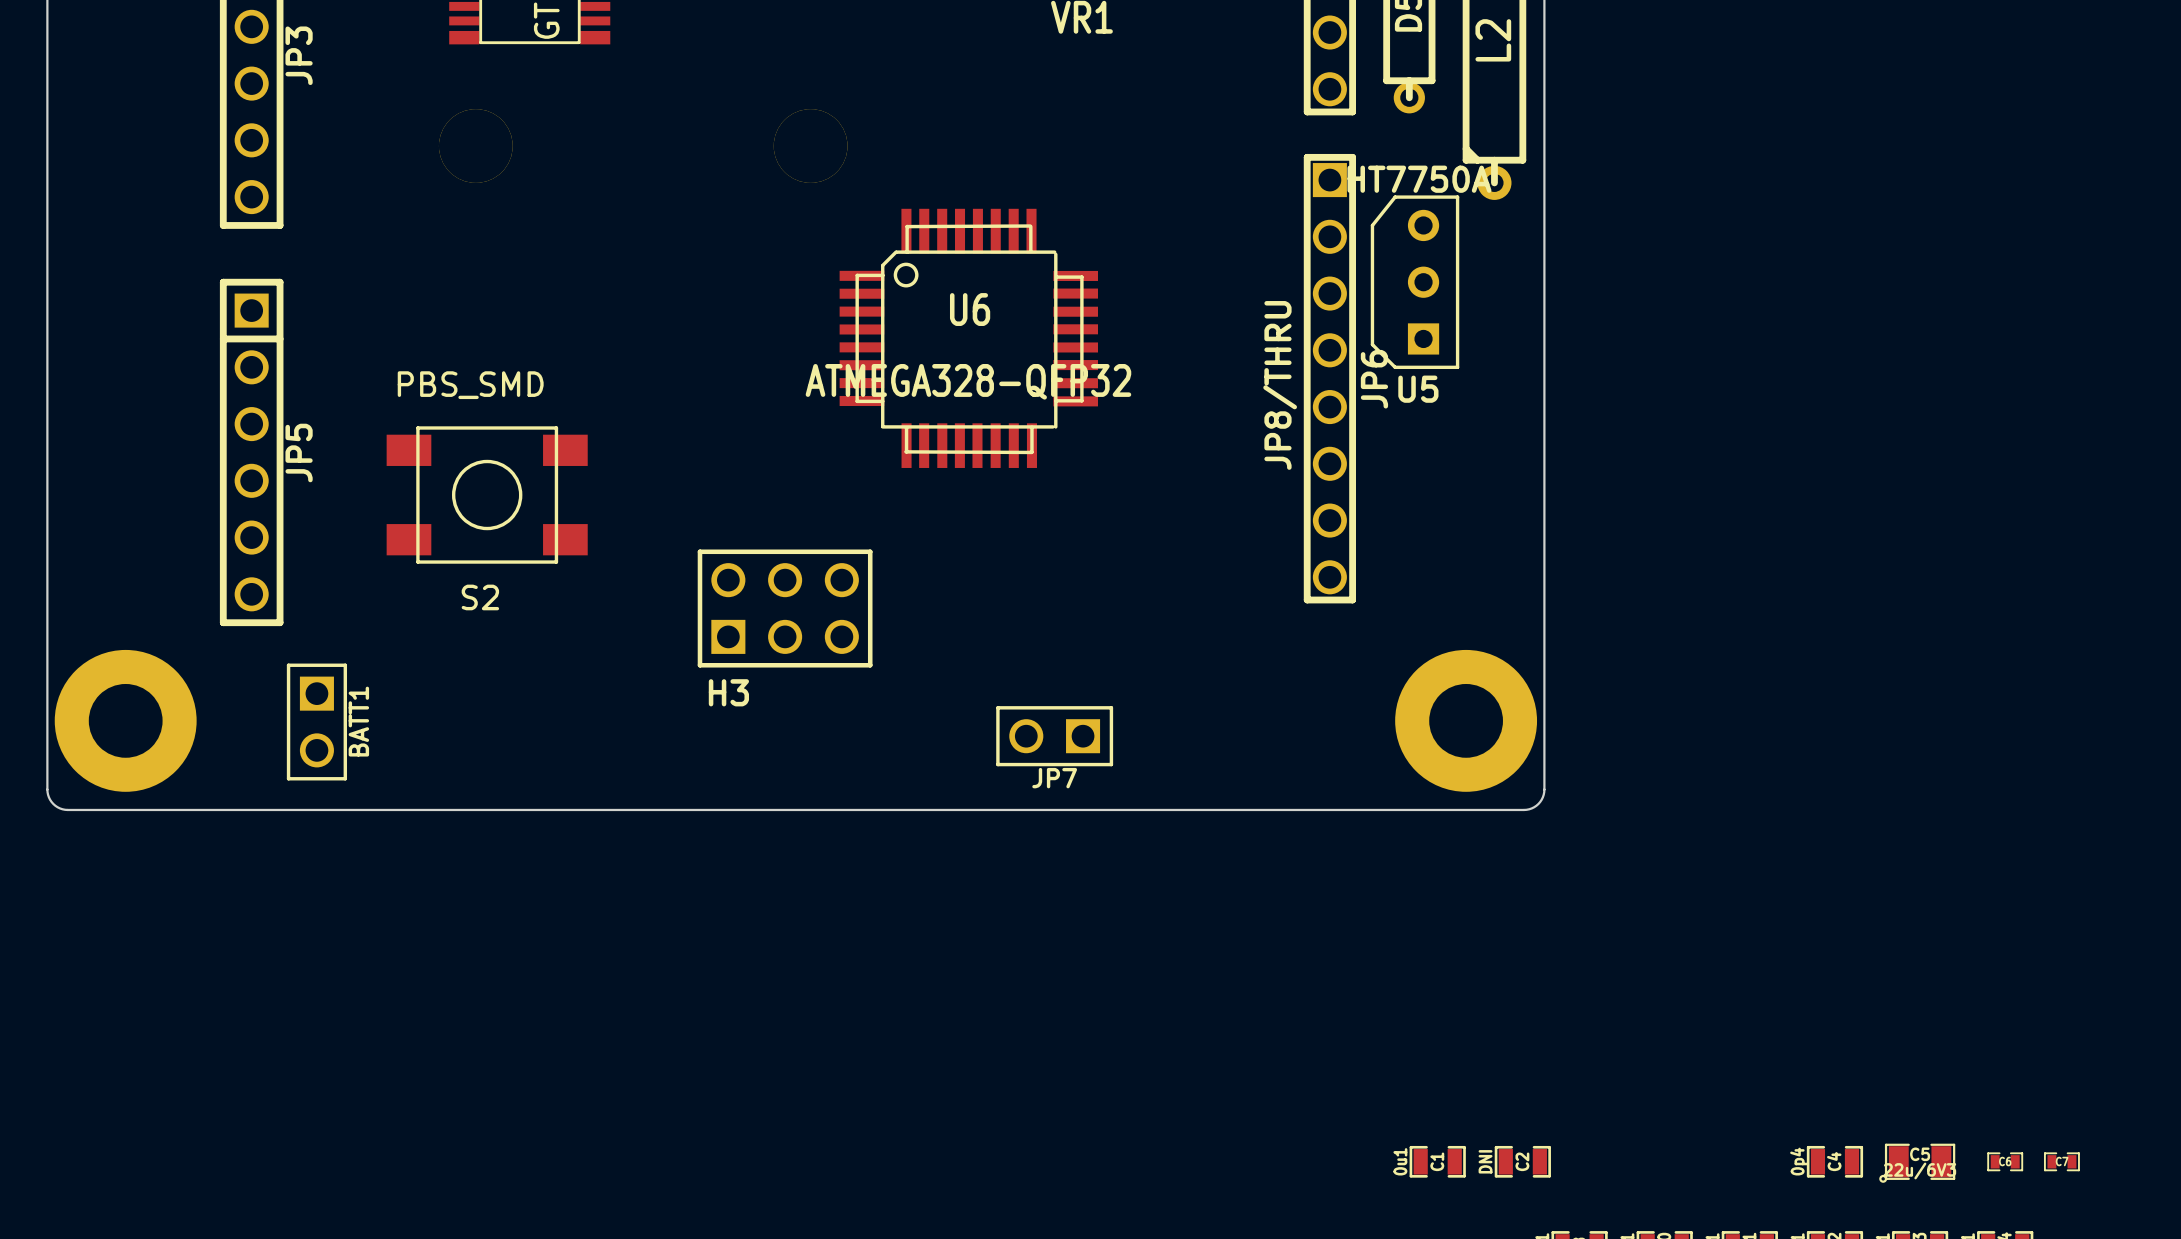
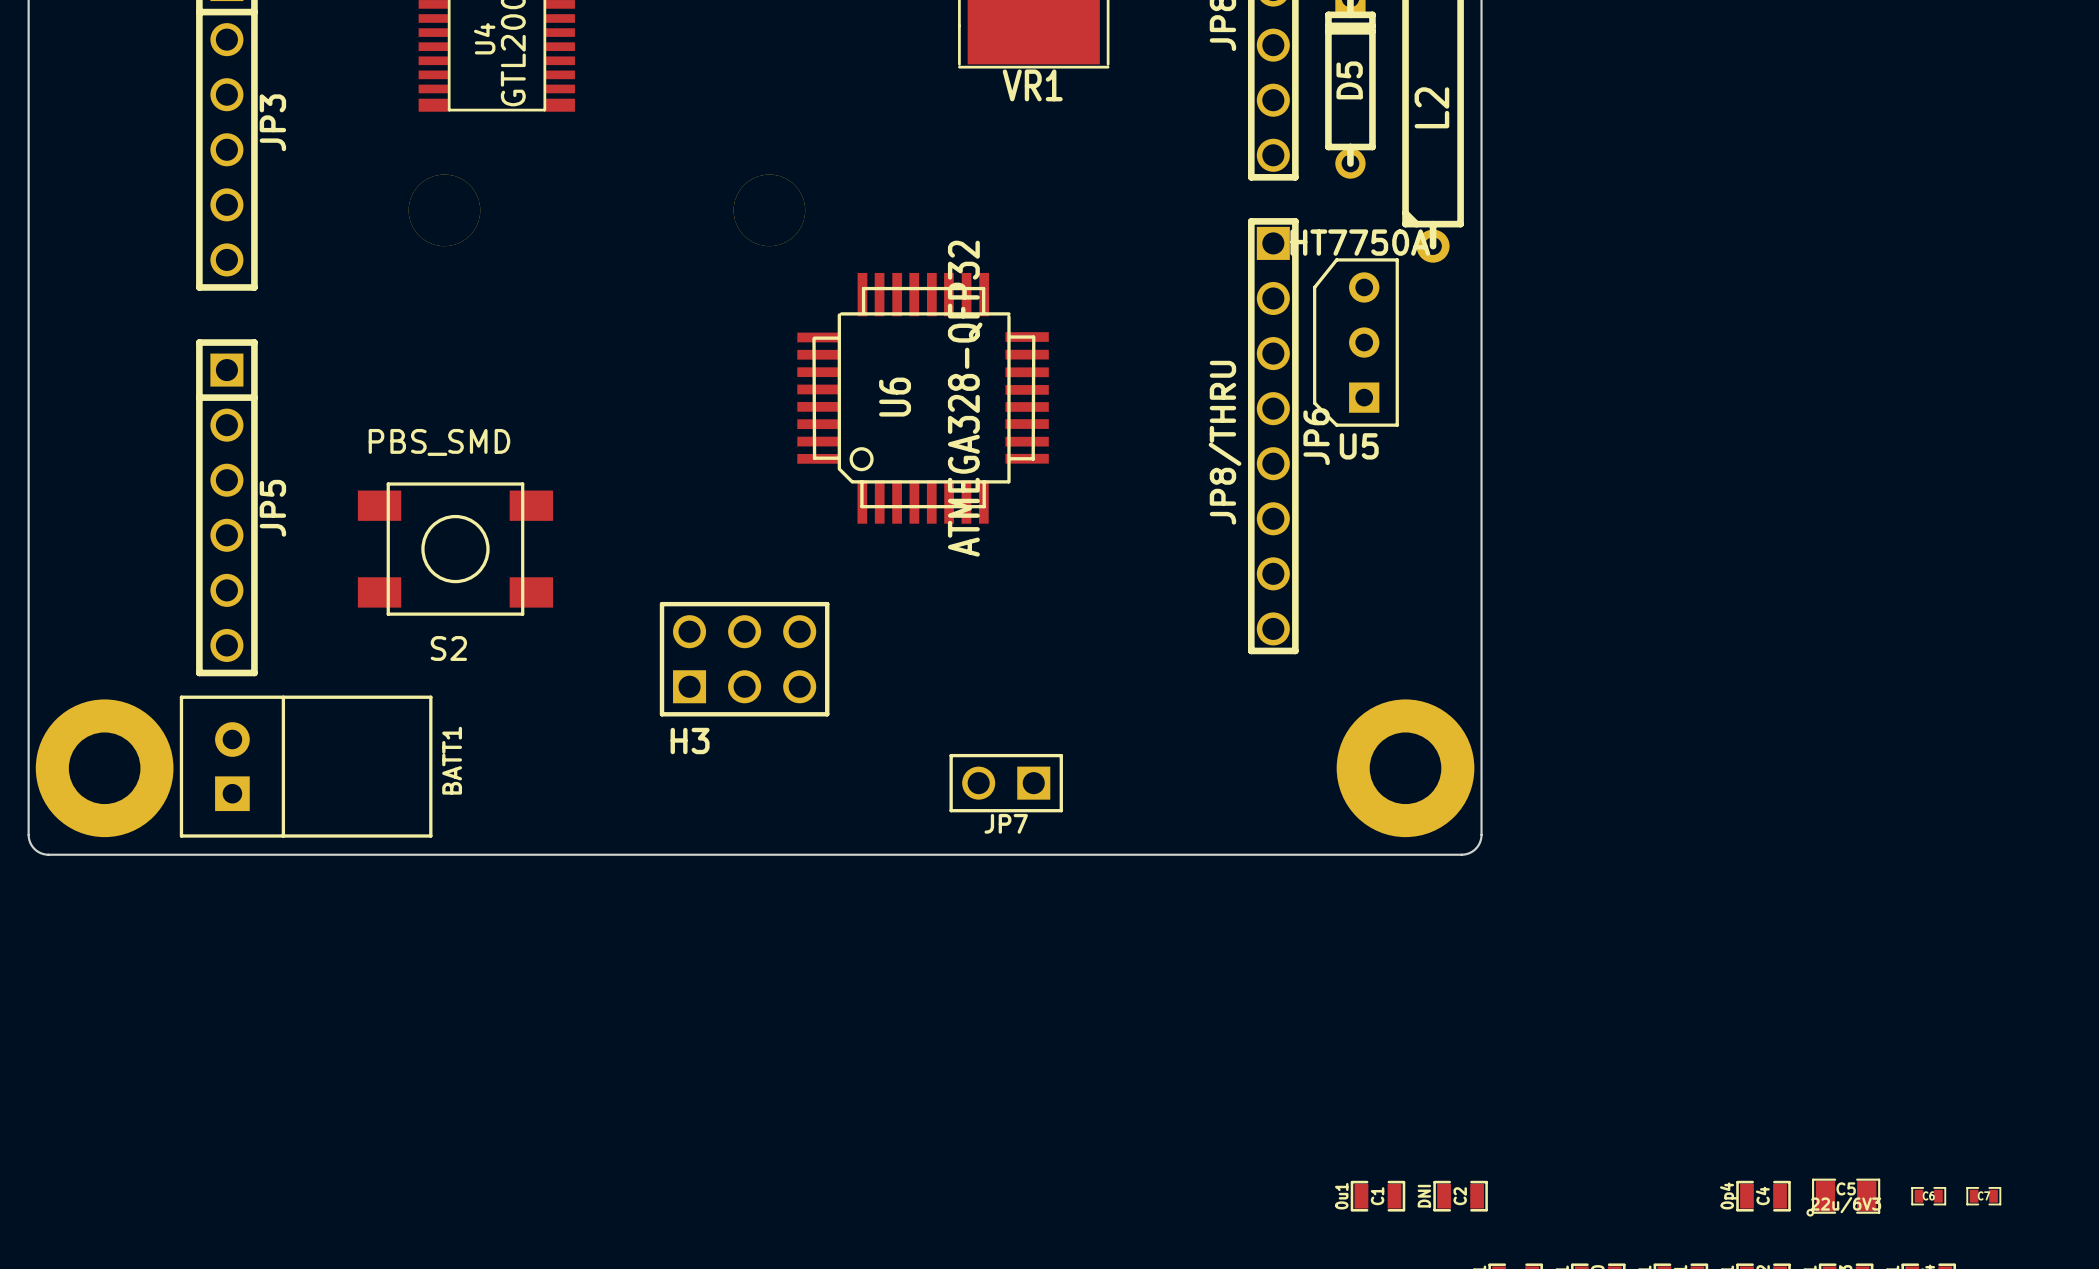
U6 rotation: 0° (968, 338) -> 90° counterclockwise (923, 398)
BATT1 footprint: [286, 663, 348, 781] -> [179, 695, 433, 838]
BATT1 name position: BATT1 (358, 721) -> BATT1 (452, 760)

